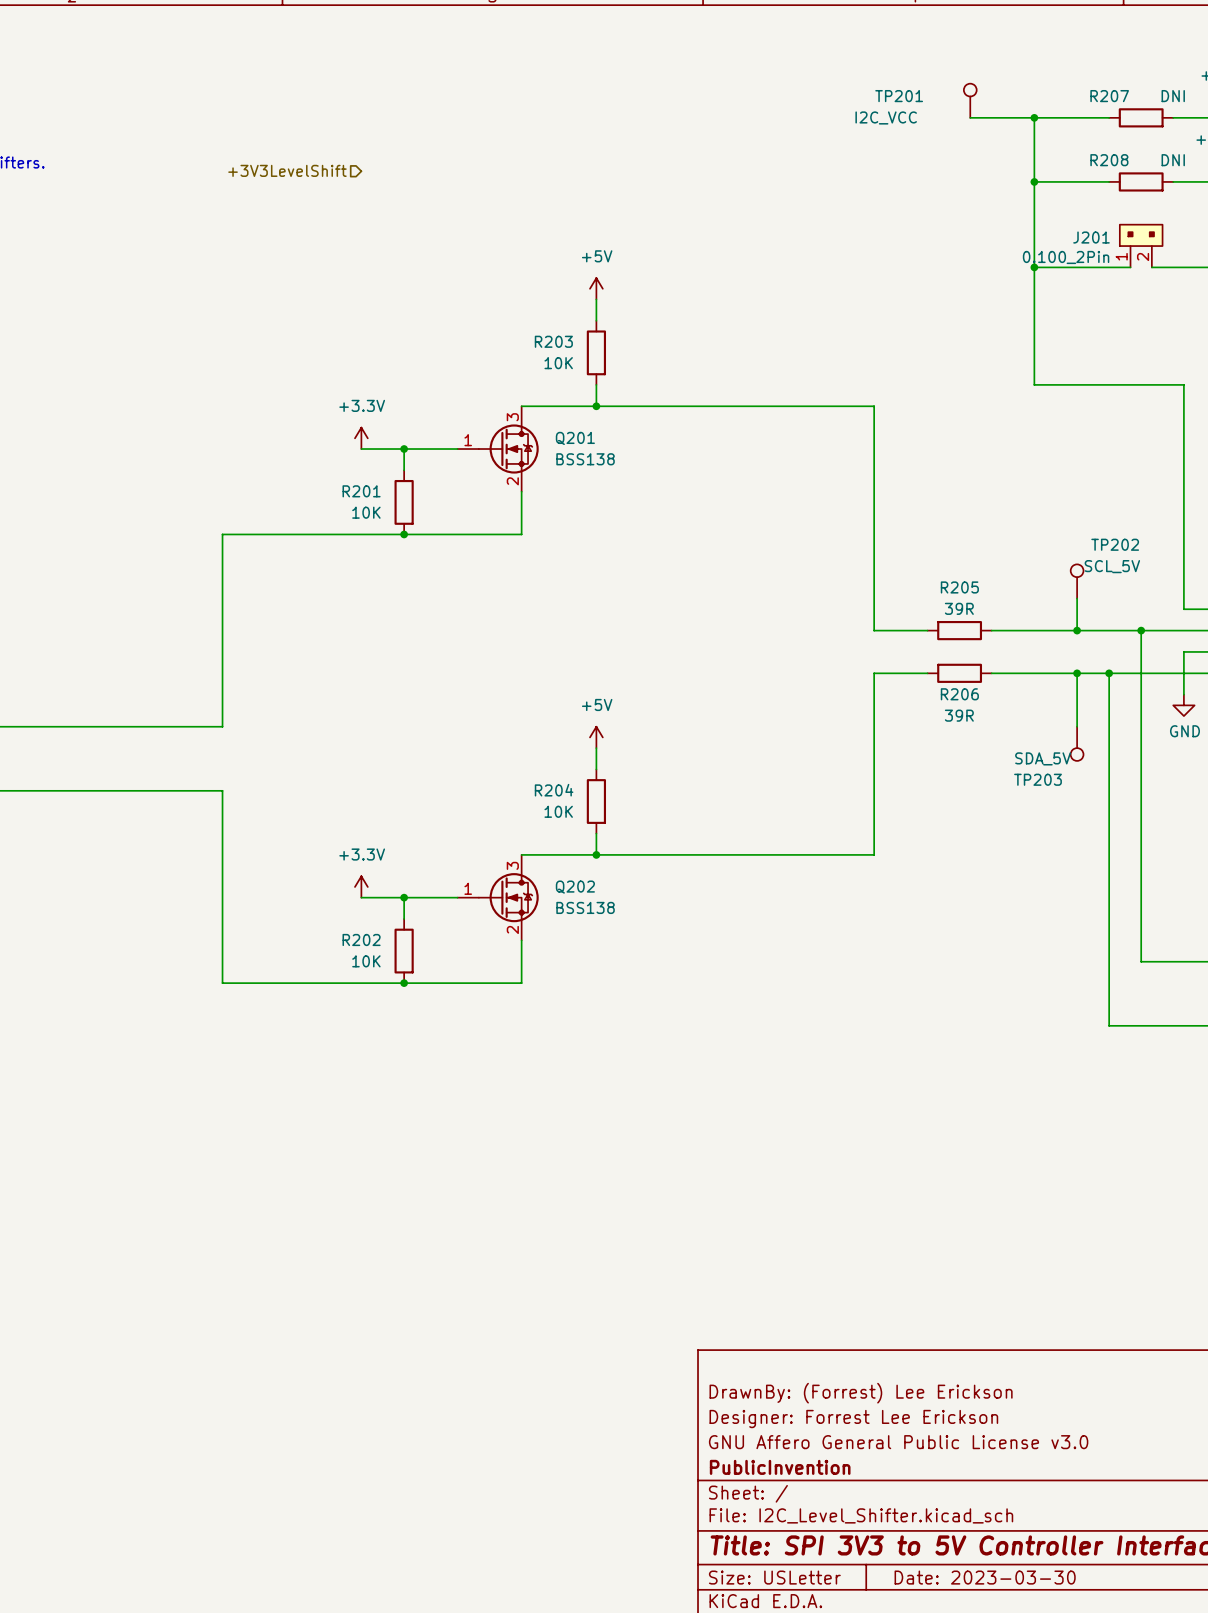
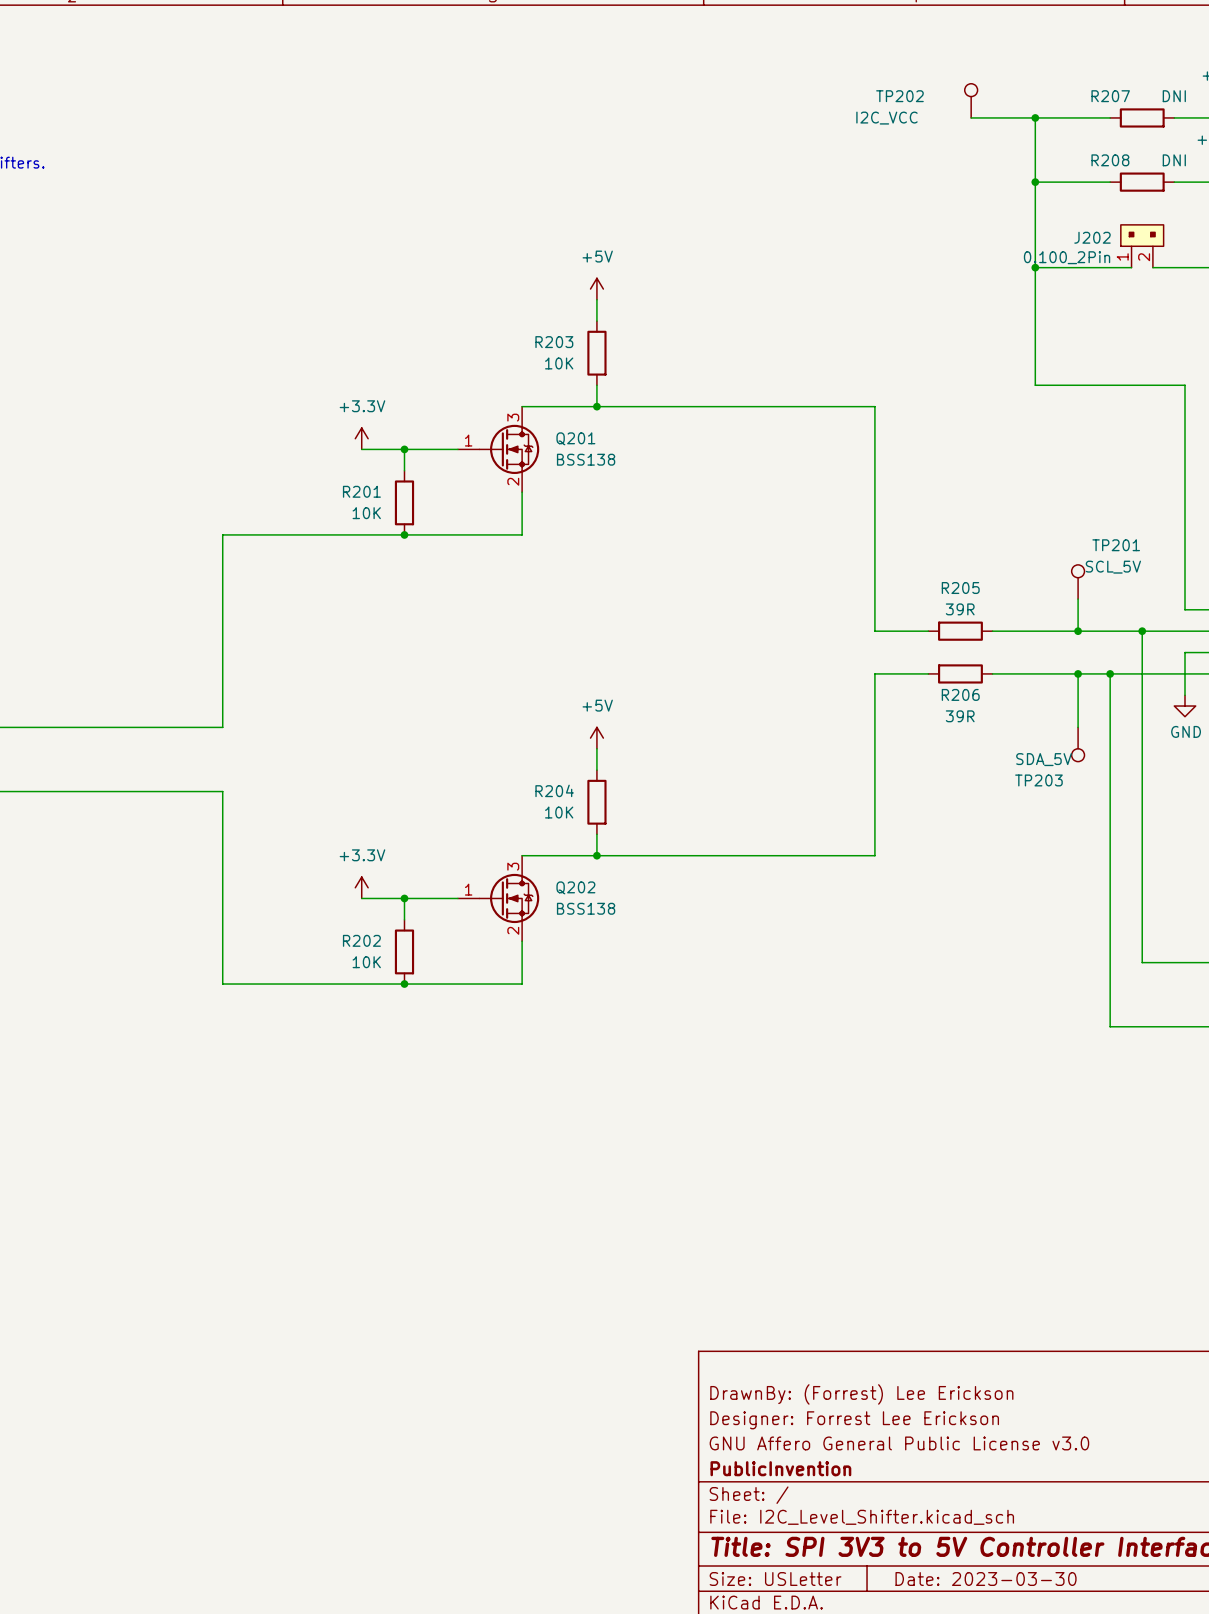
TP201 name: TP201 (899, 96) -> TP202 (899, 96)
hierarchical label: +3V3LevelShift (287, 170) -> none
J201 name: J201 (1091, 237) -> J202 (1092, 237)
TP202 name: TP202 (1115, 544) -> TP201 (1116, 545)

